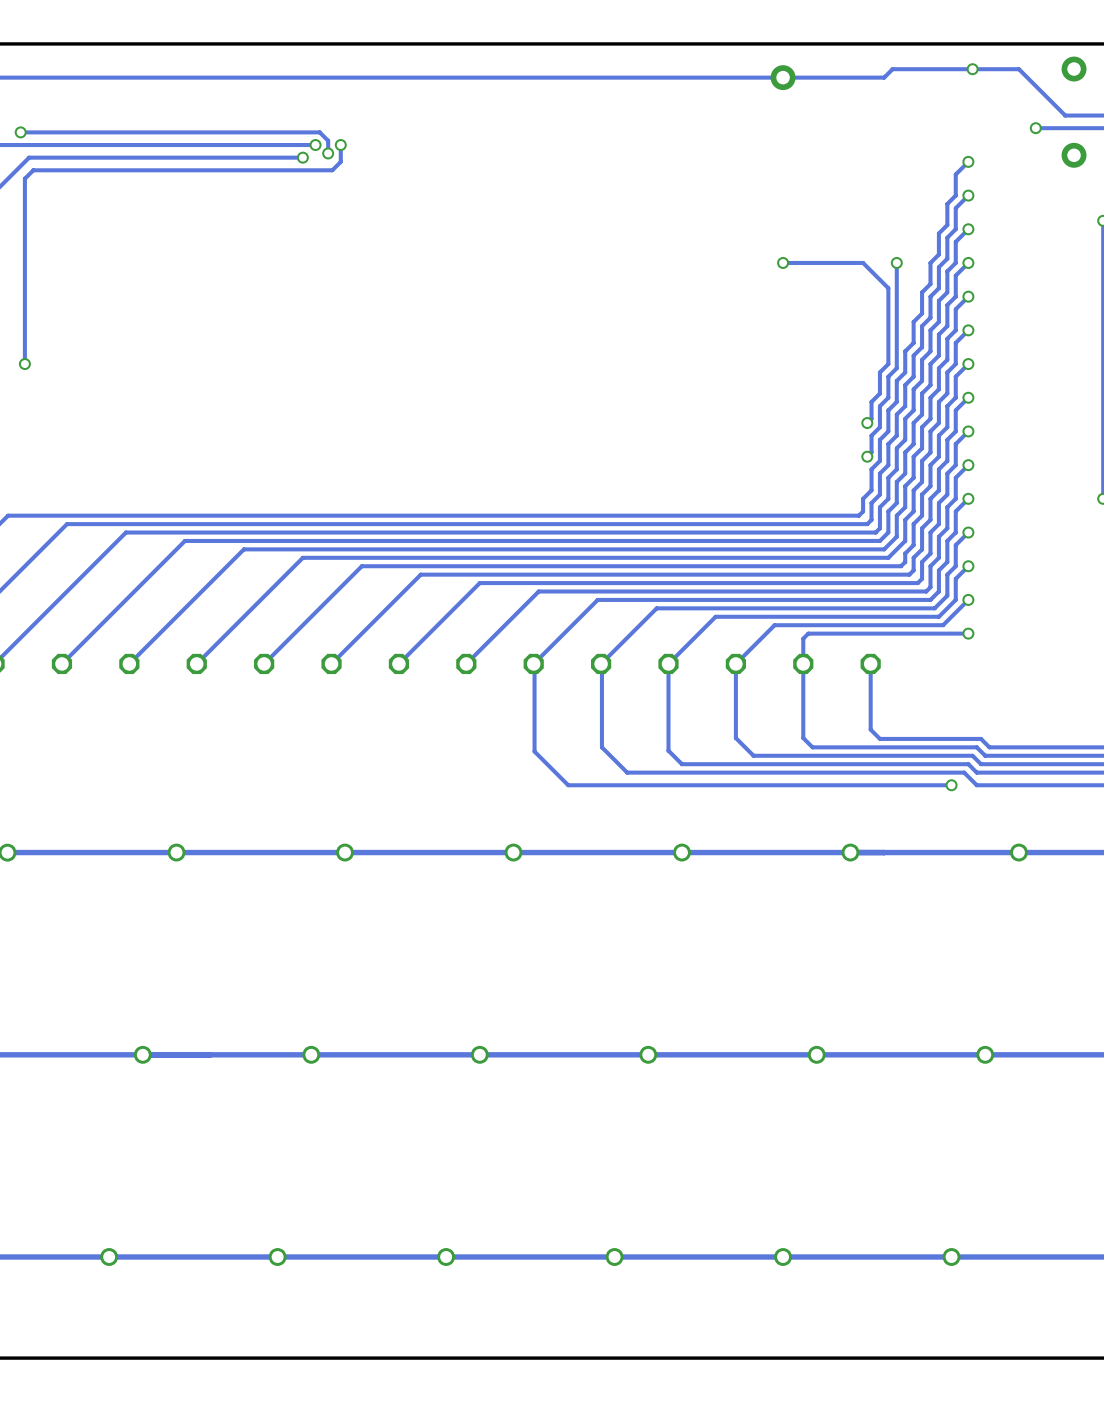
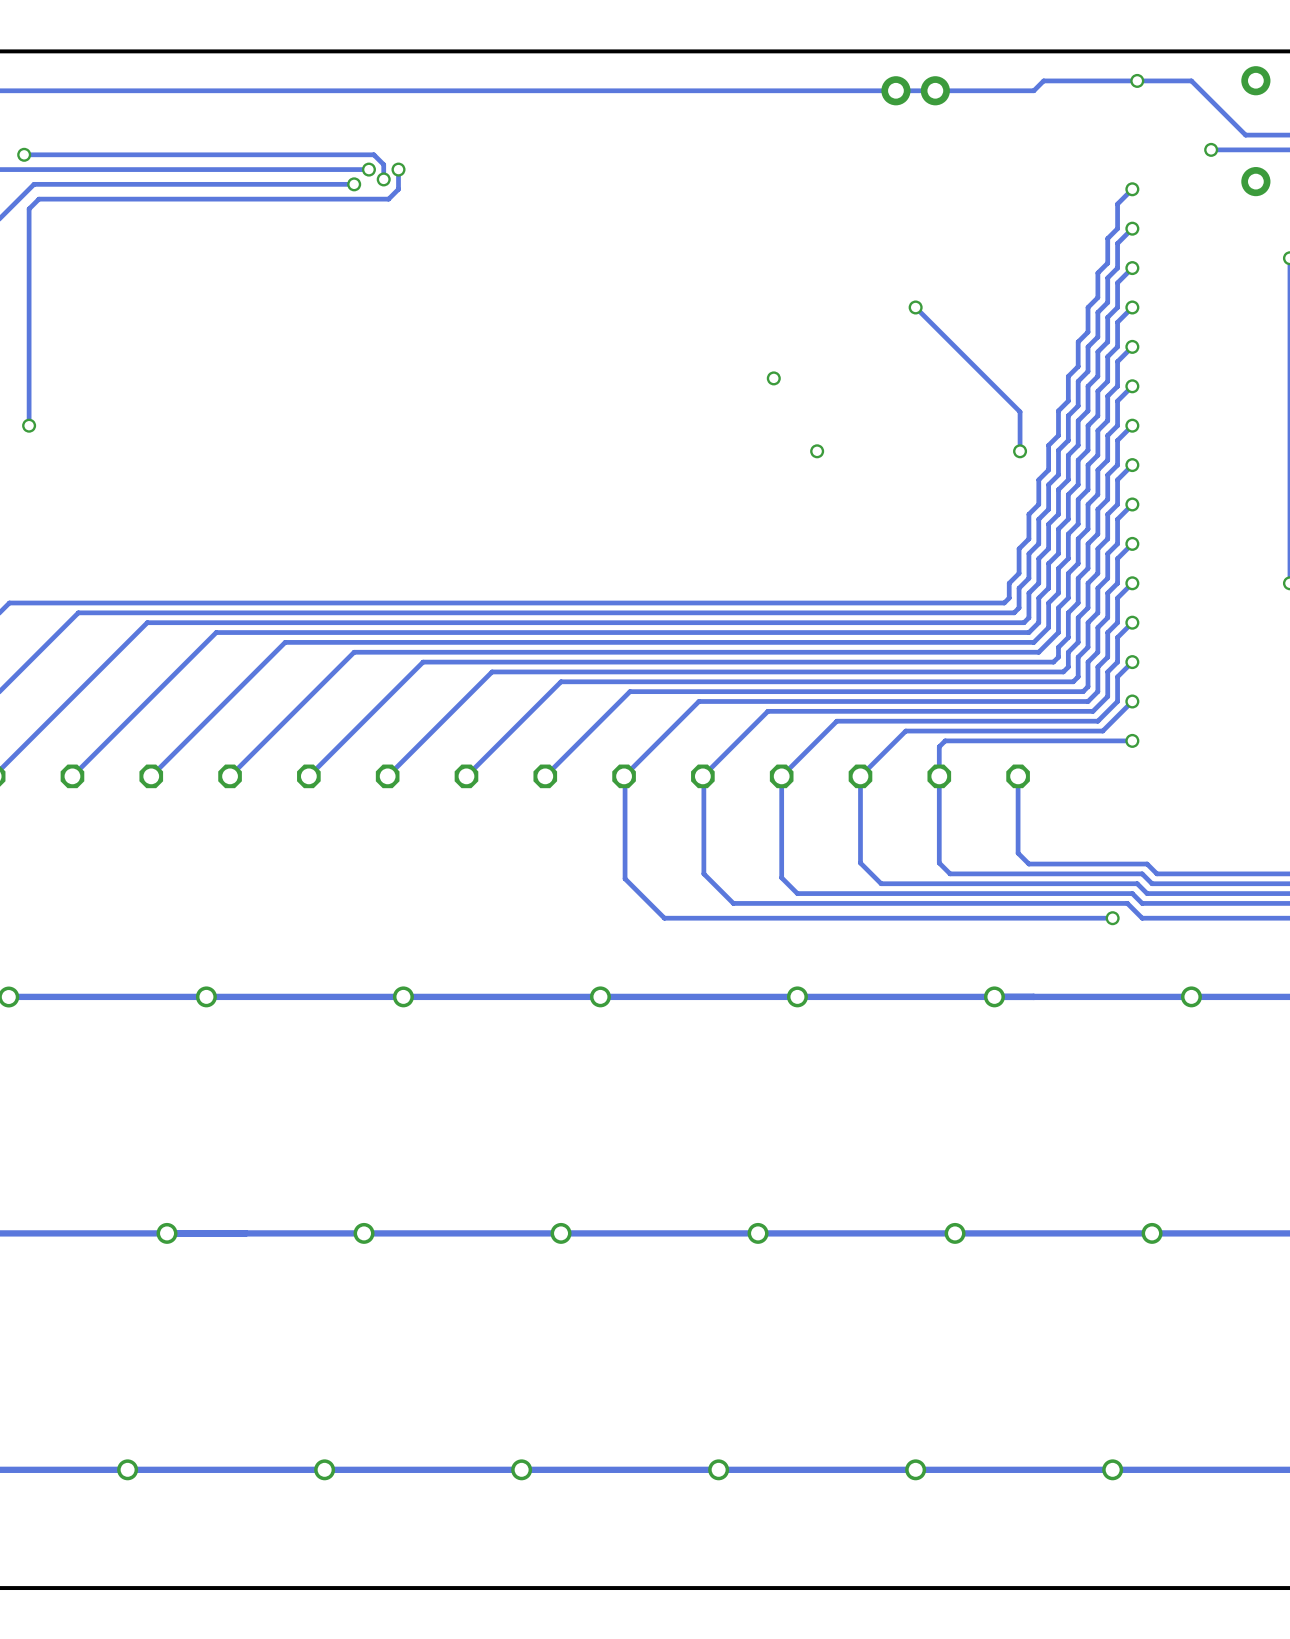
part: none -> (895, 90)
part: (783, 77) -> none
part: none -> (935, 90)
track: (783, 262) (863, 262) (888, 288) (888, 364) (879, 372) (879, 393) (871, 401) (871, 418) (867, 423) -> (915, 307) (1020, 411) (1020, 451)
track: (896, 262) (896, 368) (888, 376) (888, 397) (879, 406) (879, 427) (871, 435) (871, 452) (867, 456) -> none
via: (896, 262) -> none
via: none -> (773, 378)
via: none -> (817, 451)
via: none -> (1020, 451)
via: (867, 423) -> none
via: (867, 456) -> none

